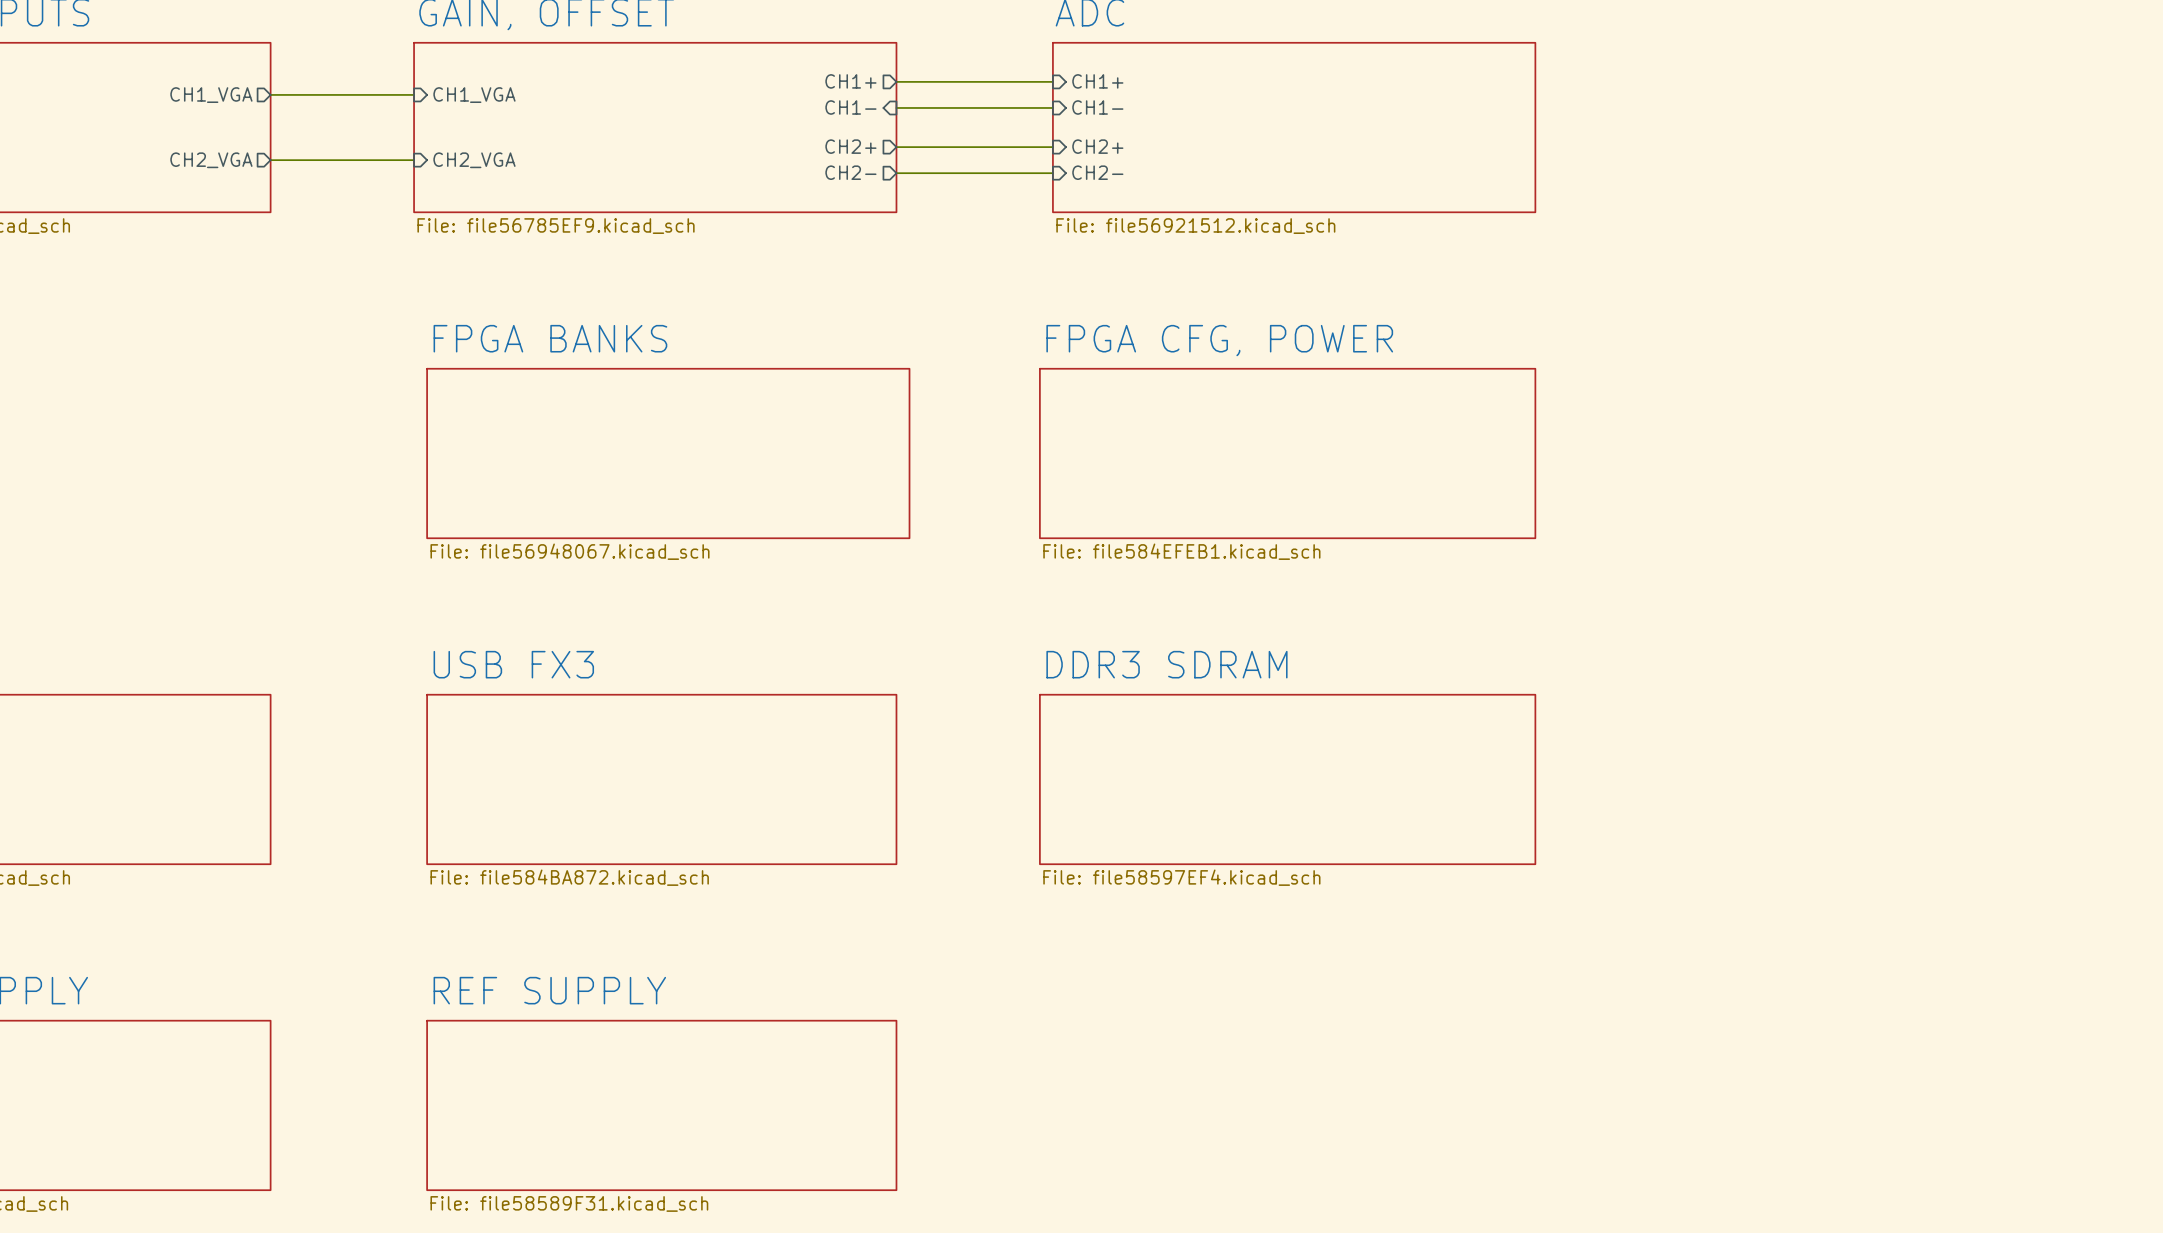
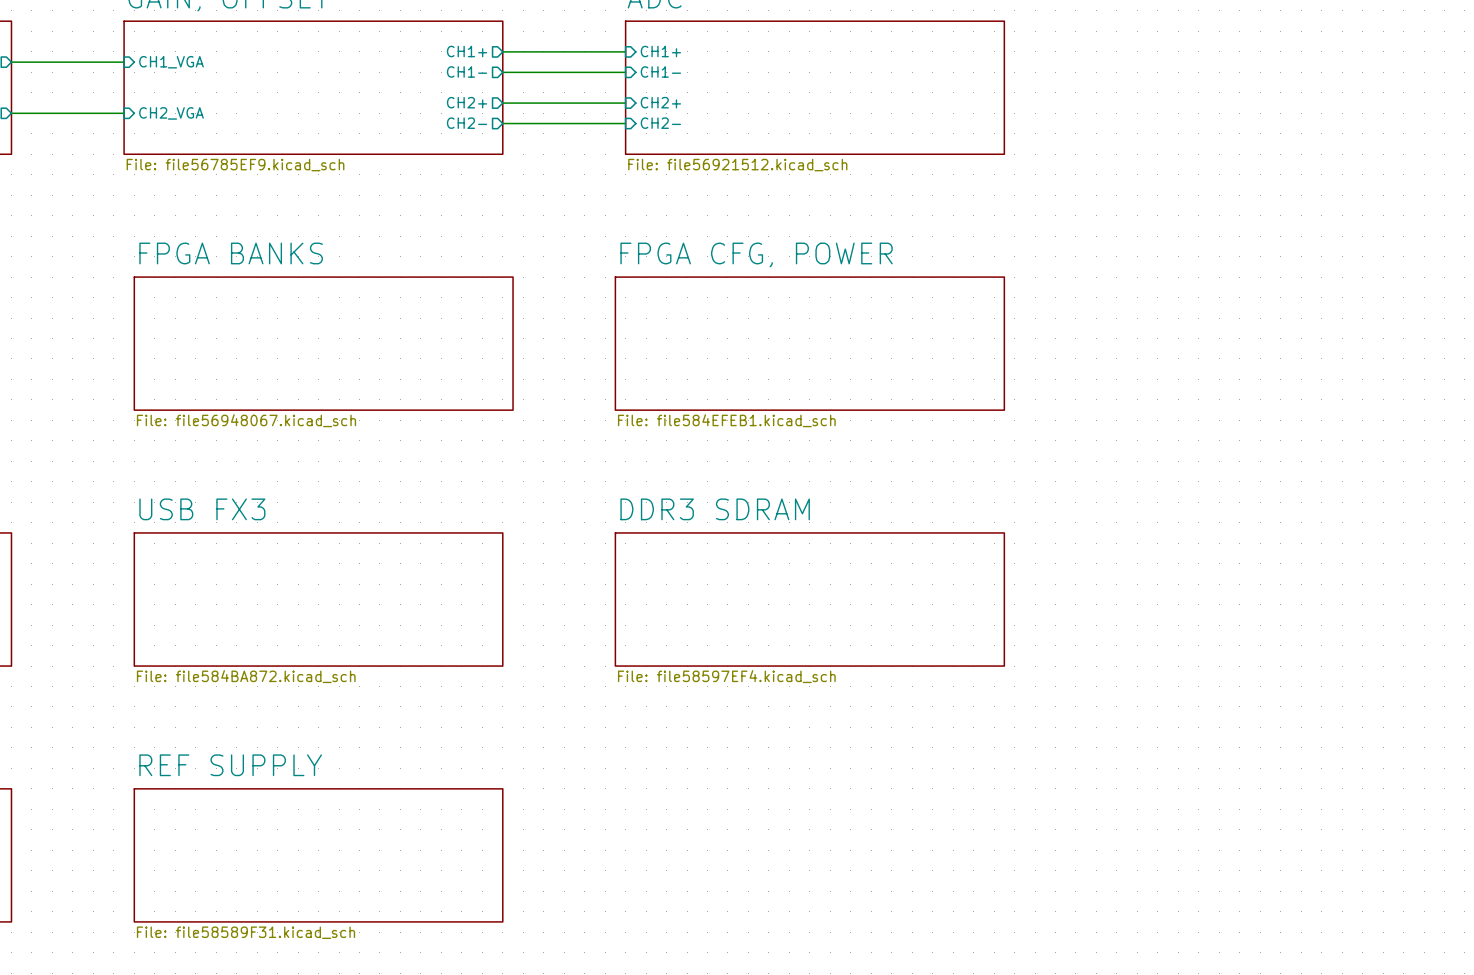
sheet pin shape: input (850, 107) -> output (467, 71)

